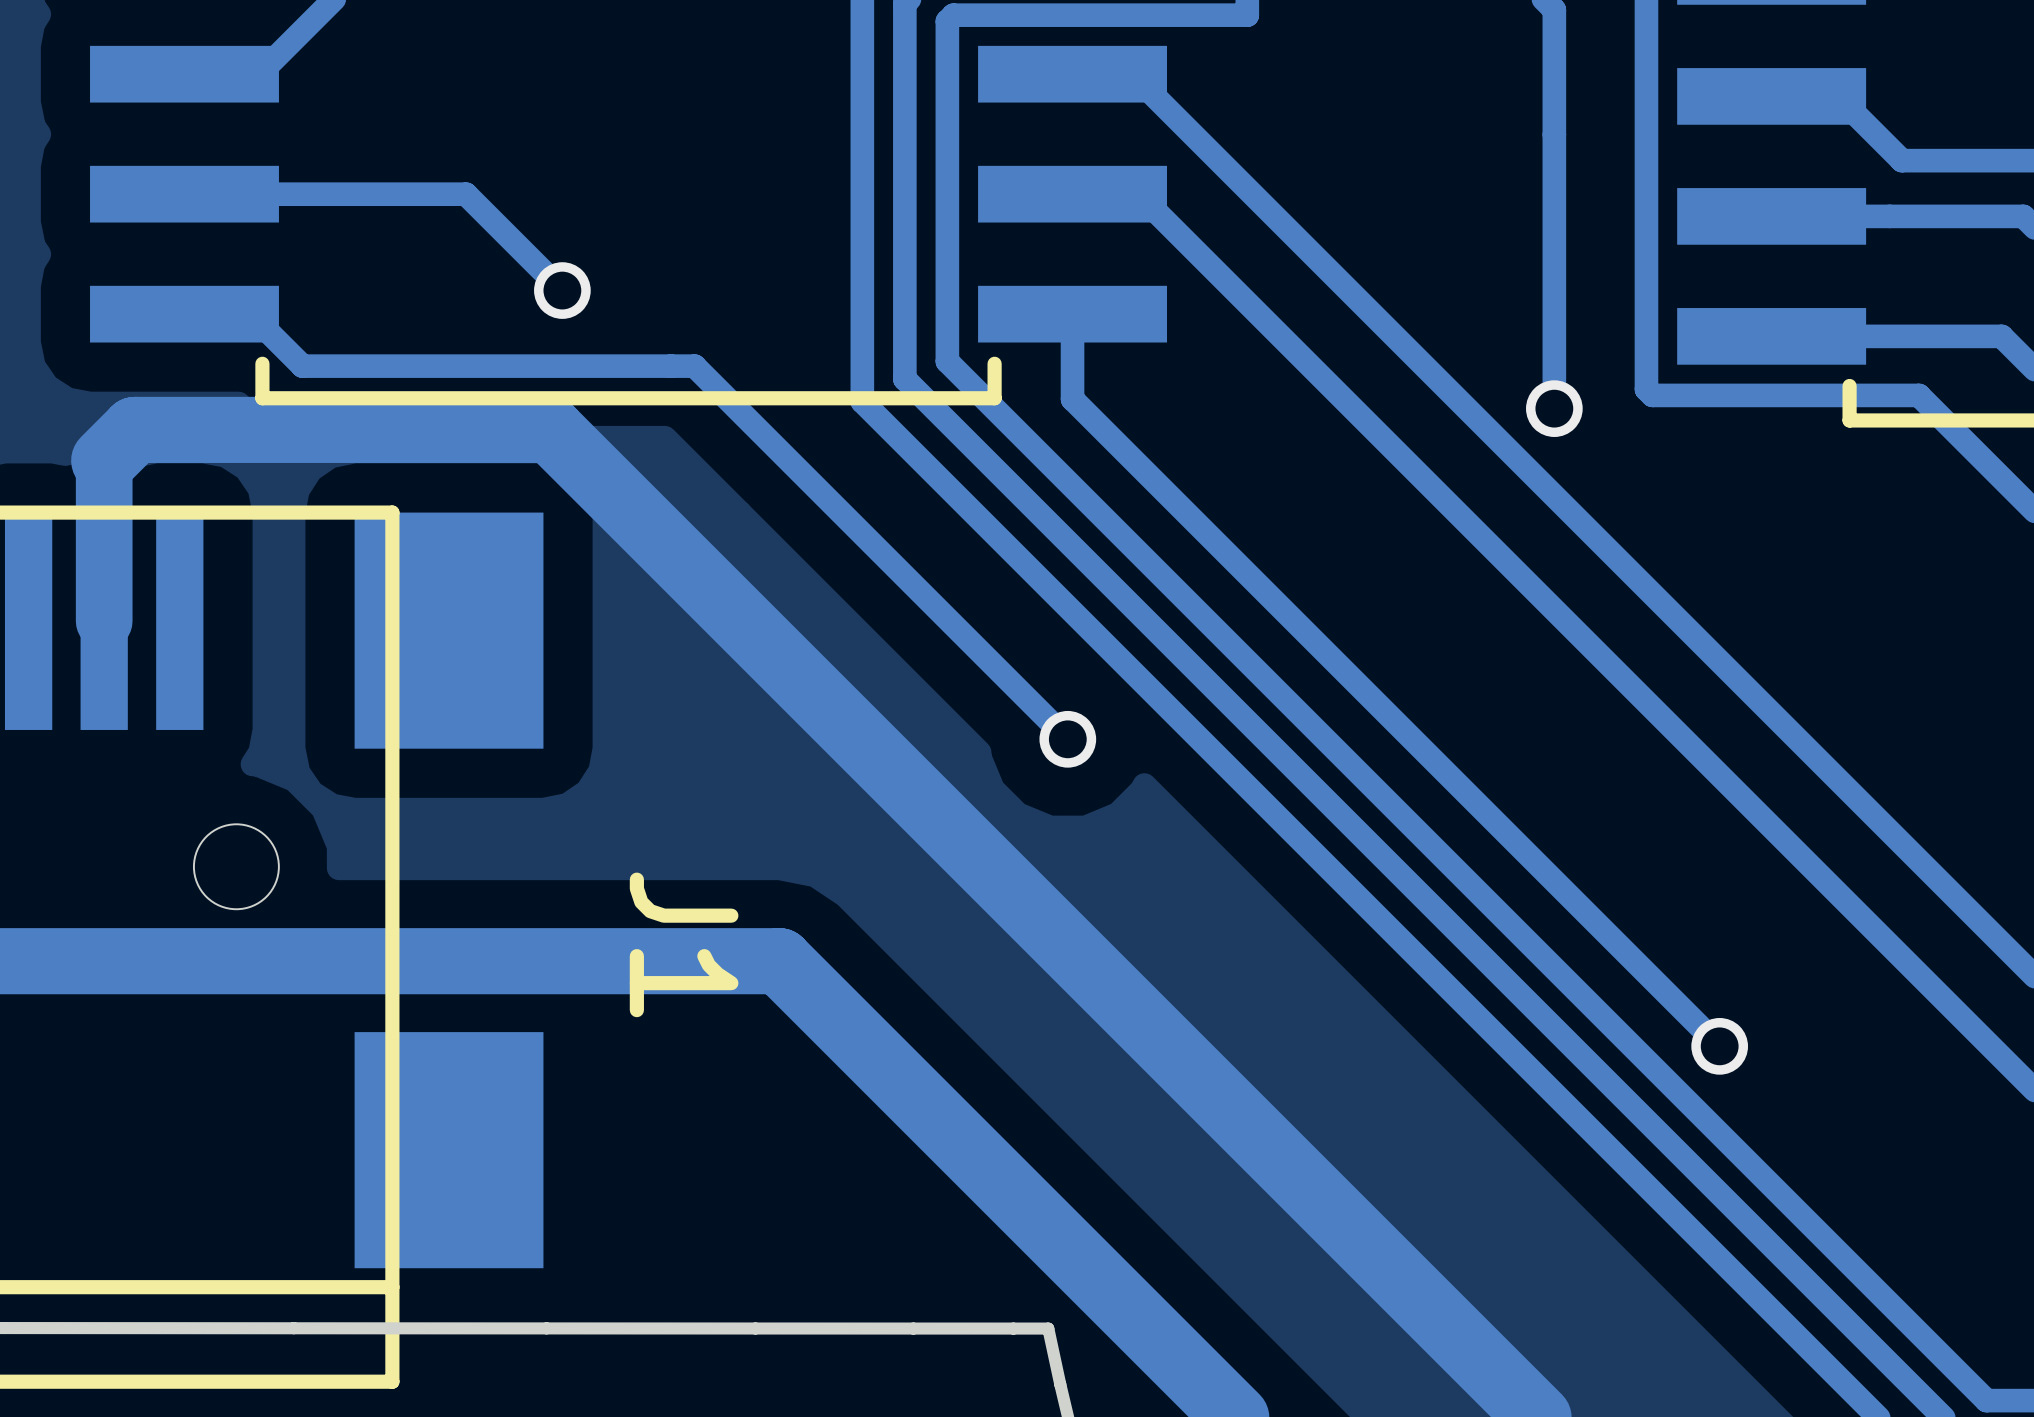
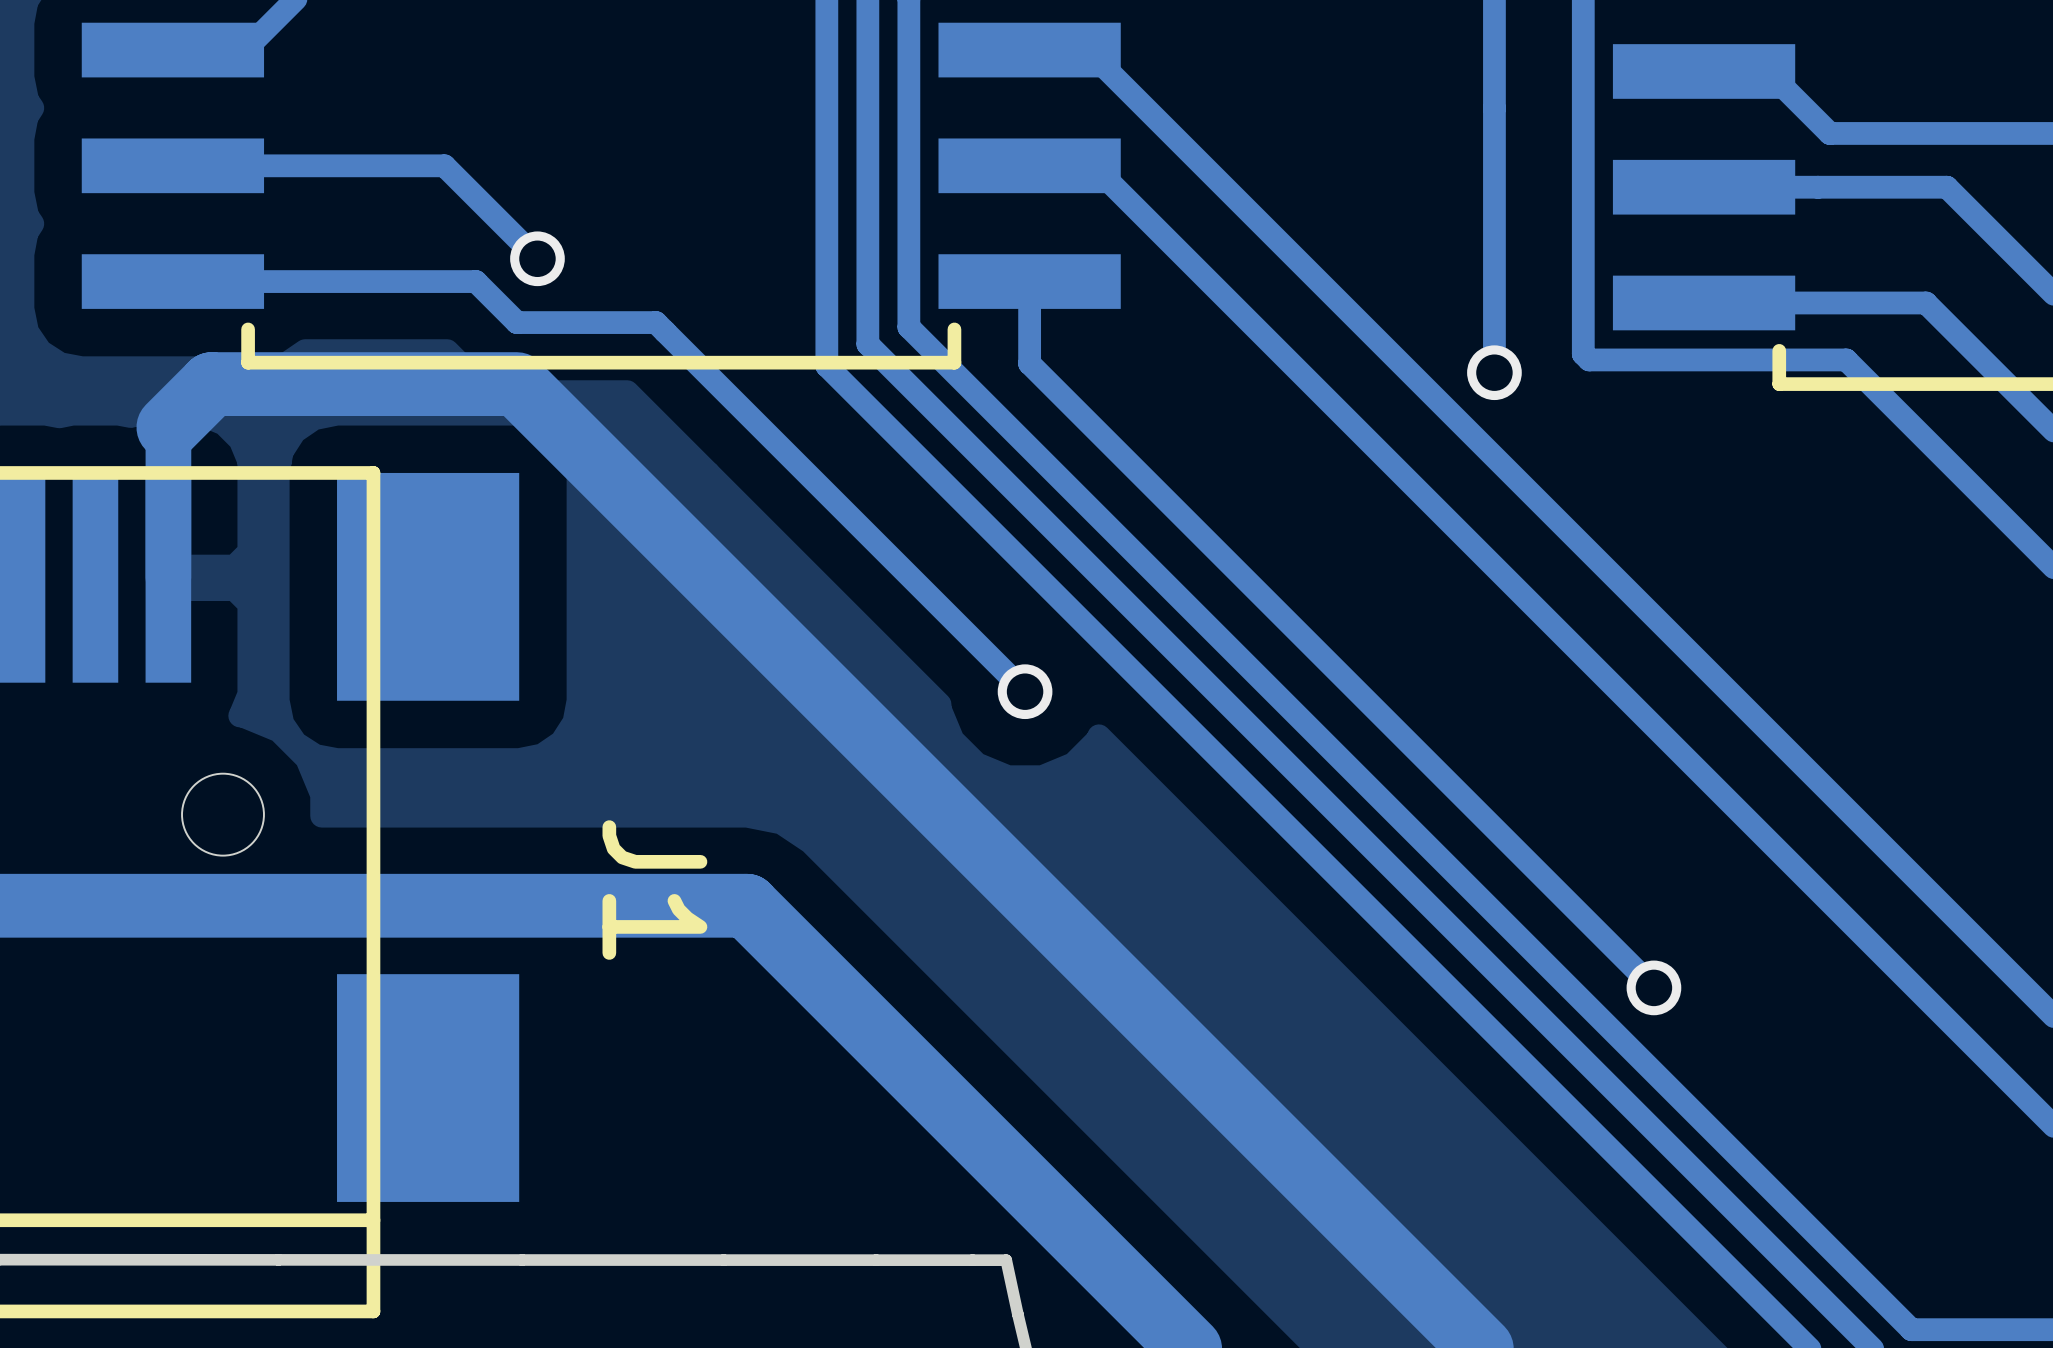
track: (250, 314) (302, 366) (694, 366) -> (236, 281) (475, 281) (516, 322) (655, 322) (665, 331)
track: (550, 429) (134, 429) (104, 460) (104, 621) -> (526, 393) (516, 384) (211, 384) (168, 427) (168, 577)

